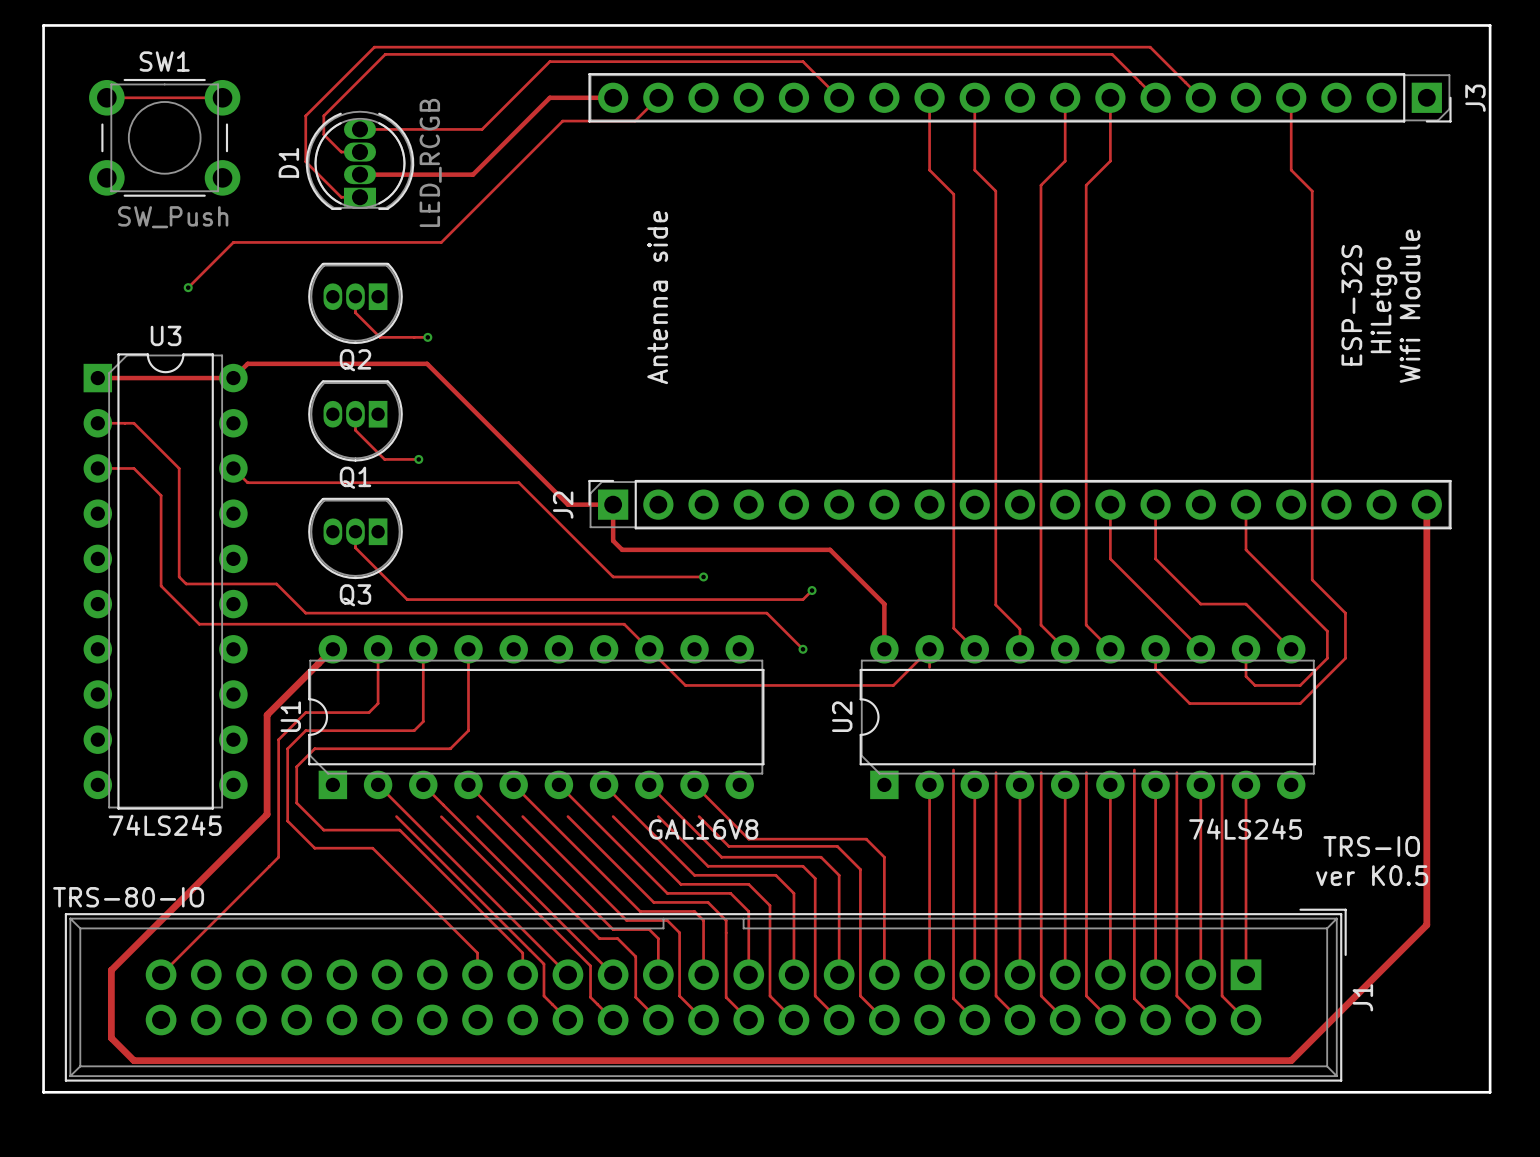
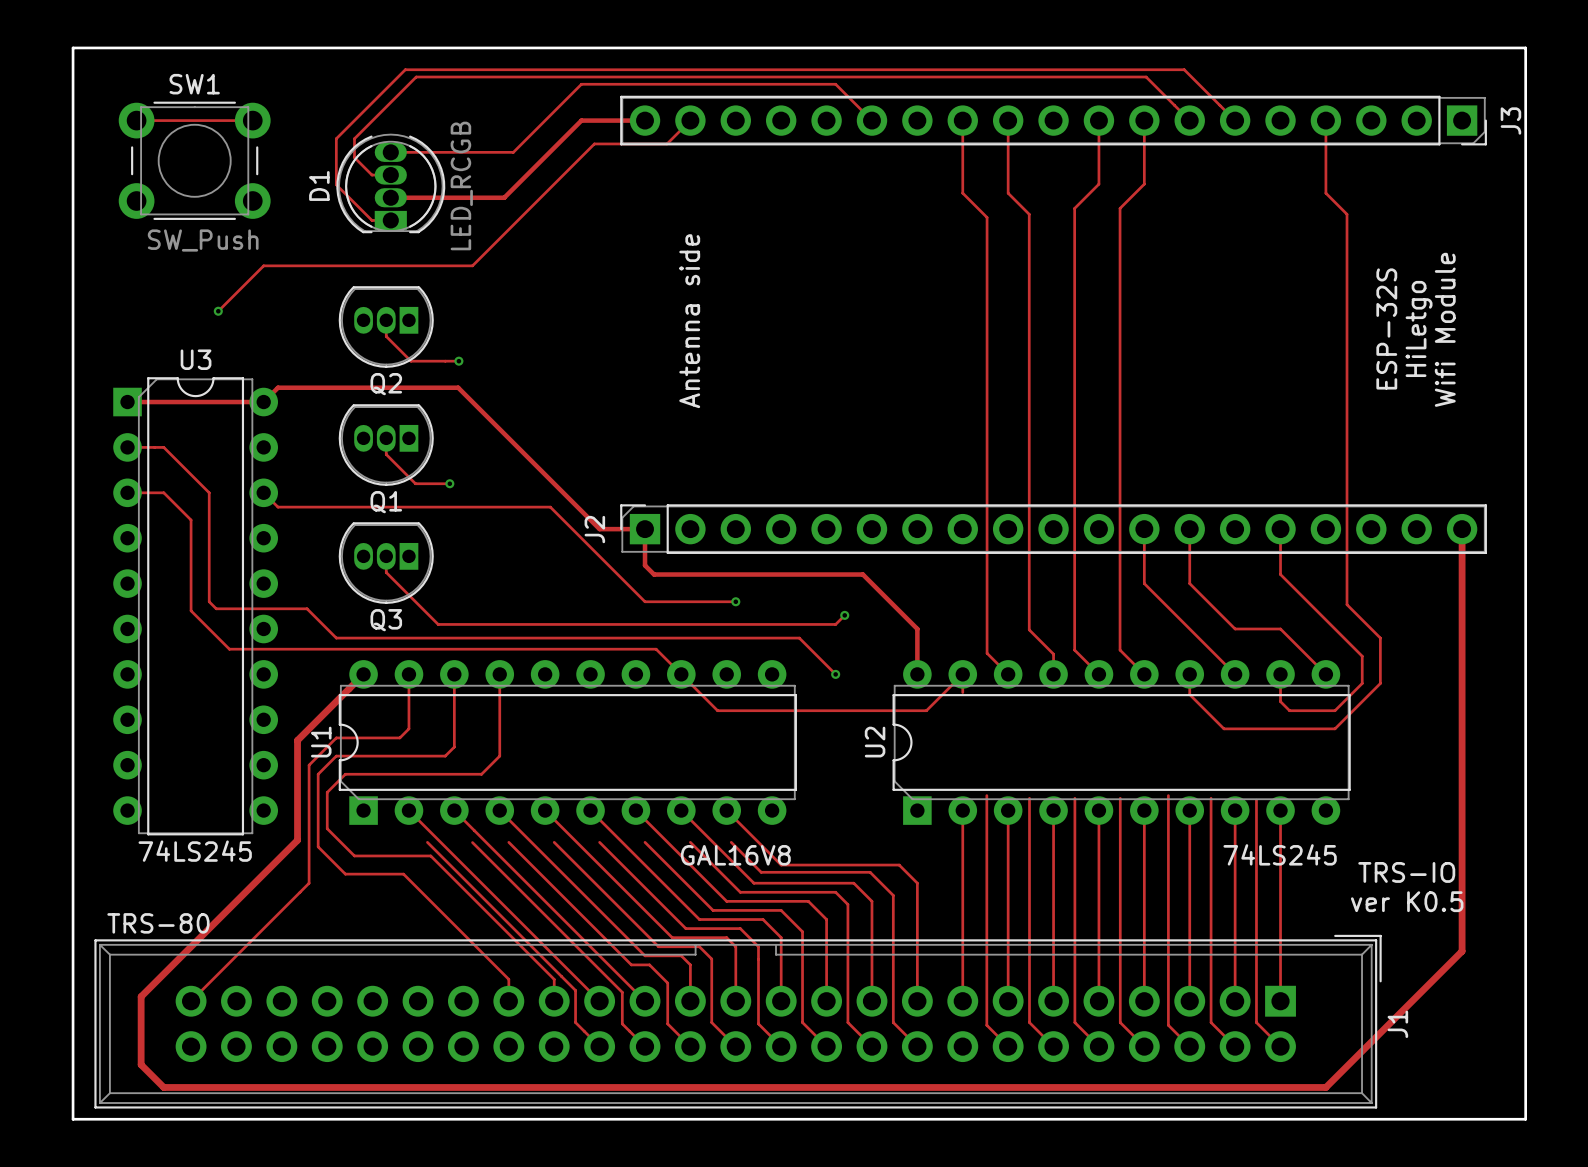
J1 value: TRS-80-IO (128, 897) -> TRS-80 (158, 923)

